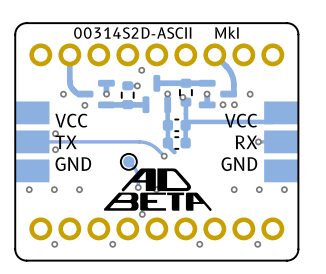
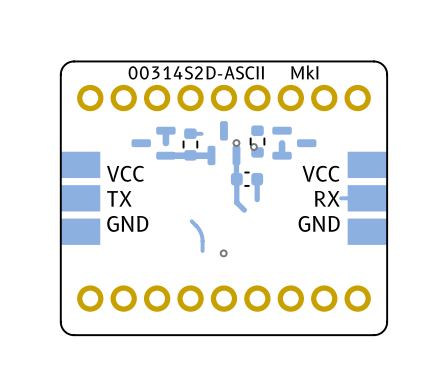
track: (69, 54) (70, 86) (77, 93) (85, 94) -> none
track: (214, 54) (228, 68) (232, 77) (233, 94) (228, 94) -> none
via: (141, 70) -> none
track: (207, 83) (156, 83) -> none
via: (137, 85) -> none
via: (63, 94) -> none
via: (106, 94) -> none
via: (207, 94) -> none
via: (250, 94) -> none
track: (182, 97) (185, 100) (185, 121) (272, 121) (281, 112) -> none
via: (223, 104) -> none
via: (234, 104) -> none
via: (84, 105) -> none
via: (55, 133) -> none
track: (32, 141) (142, 142) (152, 145) (164, 156) -> none
via: (258, 141) -> none
part: (176, 143) -> none
via: (55, 149) -> none
via: (164, 156) -> none
part: (128, 161) -> none
drawing: [103, 168, 212, 211] -> none
via: (138, 187) -> none
via: (29, 189) -> none
via: (54, 189) -> none
via: (79, 189) -> none
via: (234, 189) -> none
via: (259, 189) -> none
via: (284, 189) -> none
via: (142, 214) -> none
via: (54, 244) -> none
via: (112, 244) -> none
via: (199, 244) -> none
via: (257, 244) -> none

